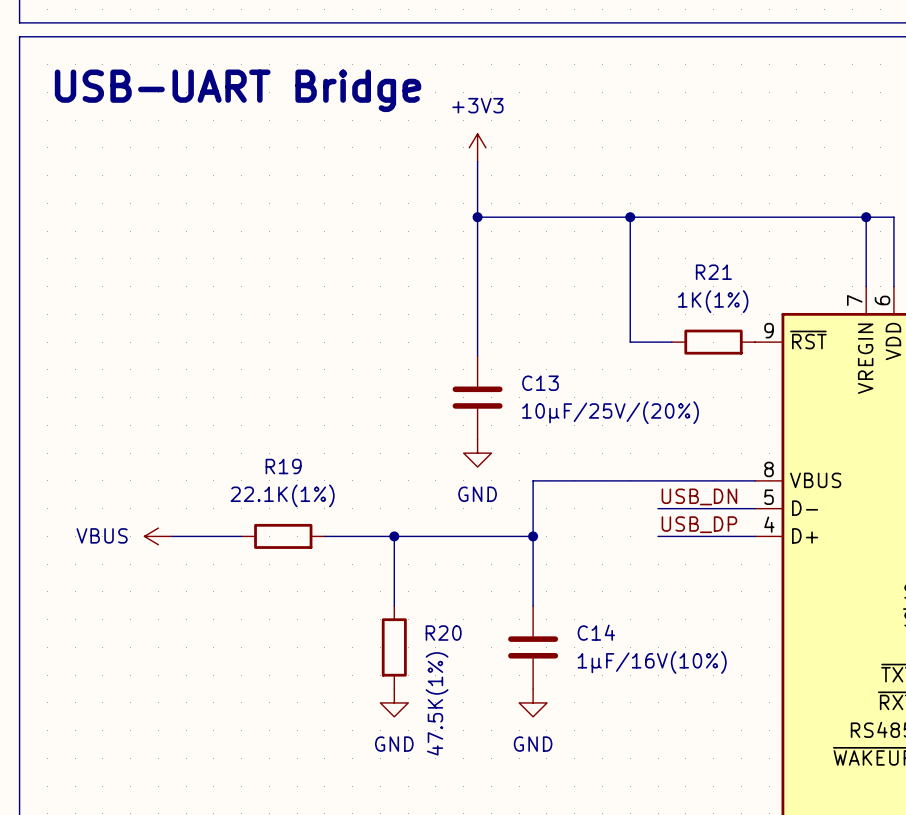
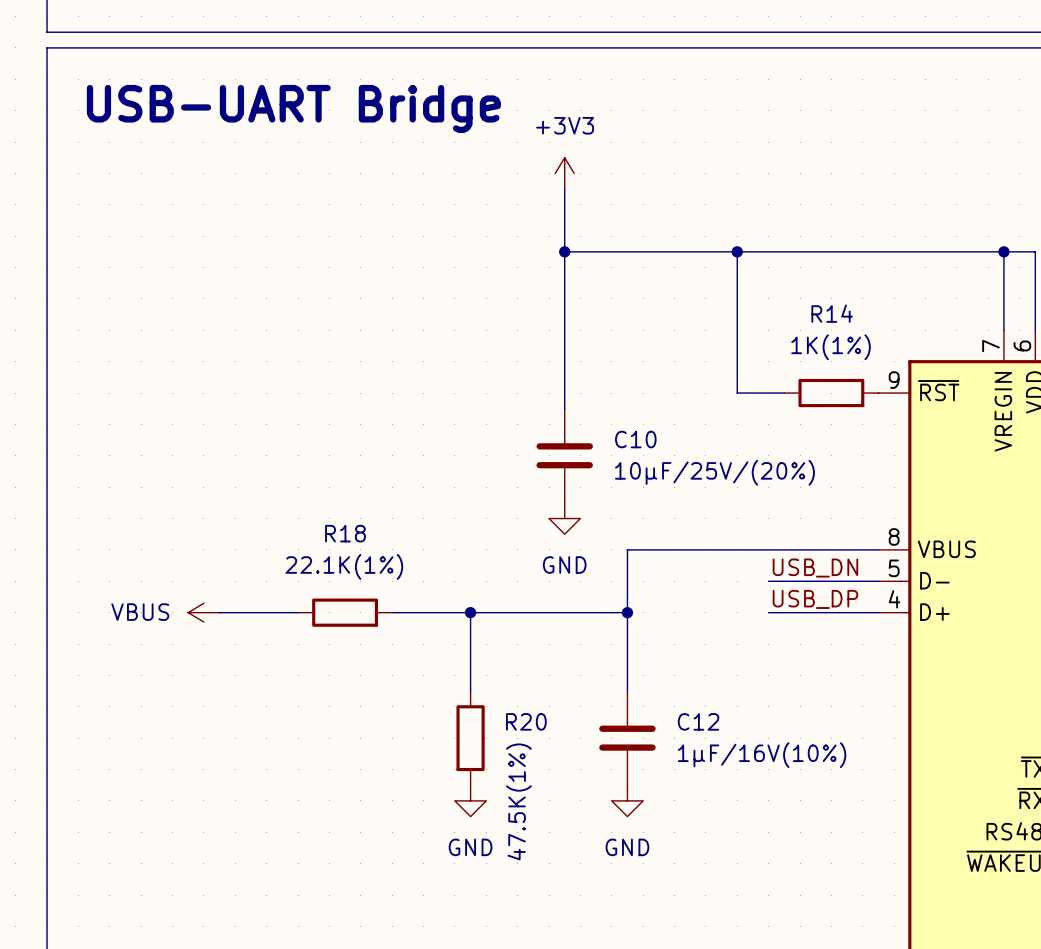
R21 name: R21 (713, 272) -> R14 (832, 313)
C13 name: C13 (540, 383) -> C10 (635, 439)
R19 name: R19 (283, 466) -> R18 (345, 533)
C14 name: C14 (596, 632) -> C12 (698, 721)

